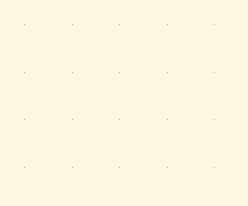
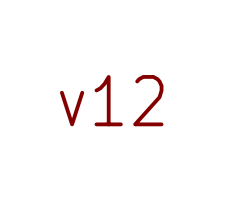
text: none -> v12 (111, 100)

